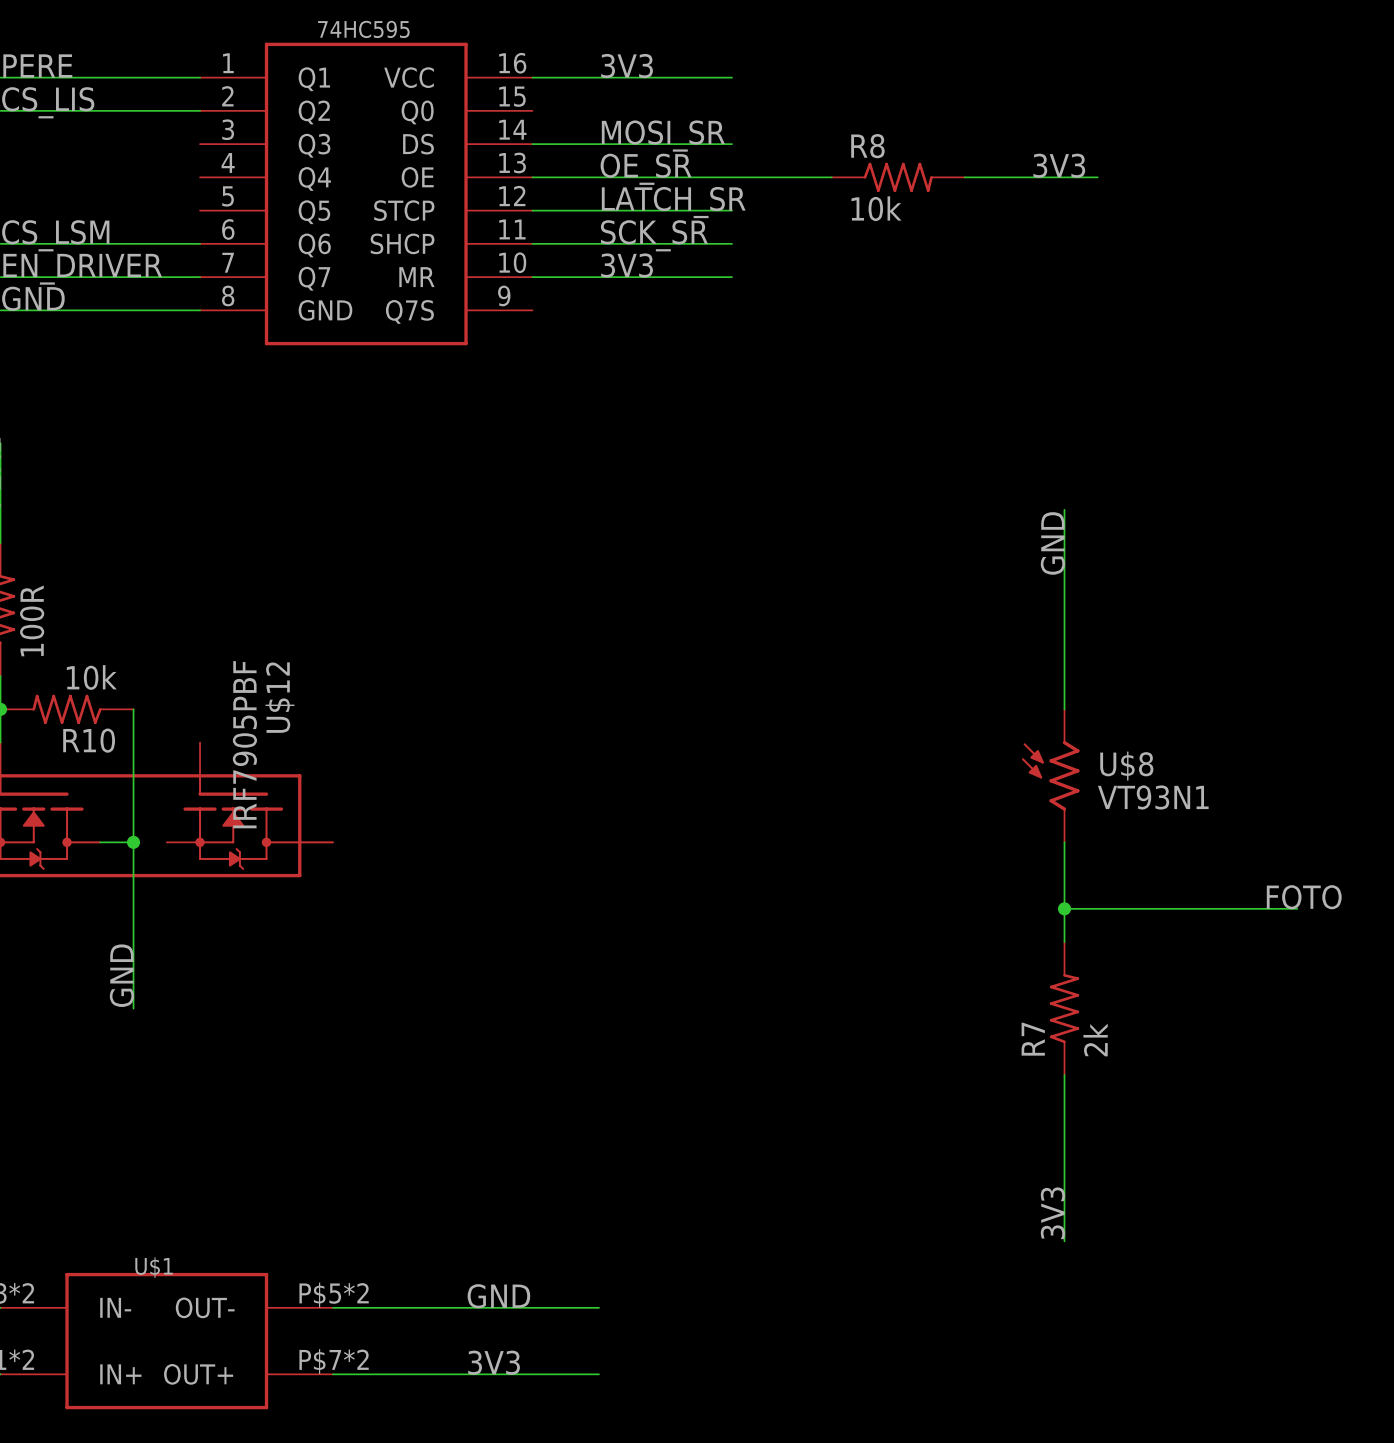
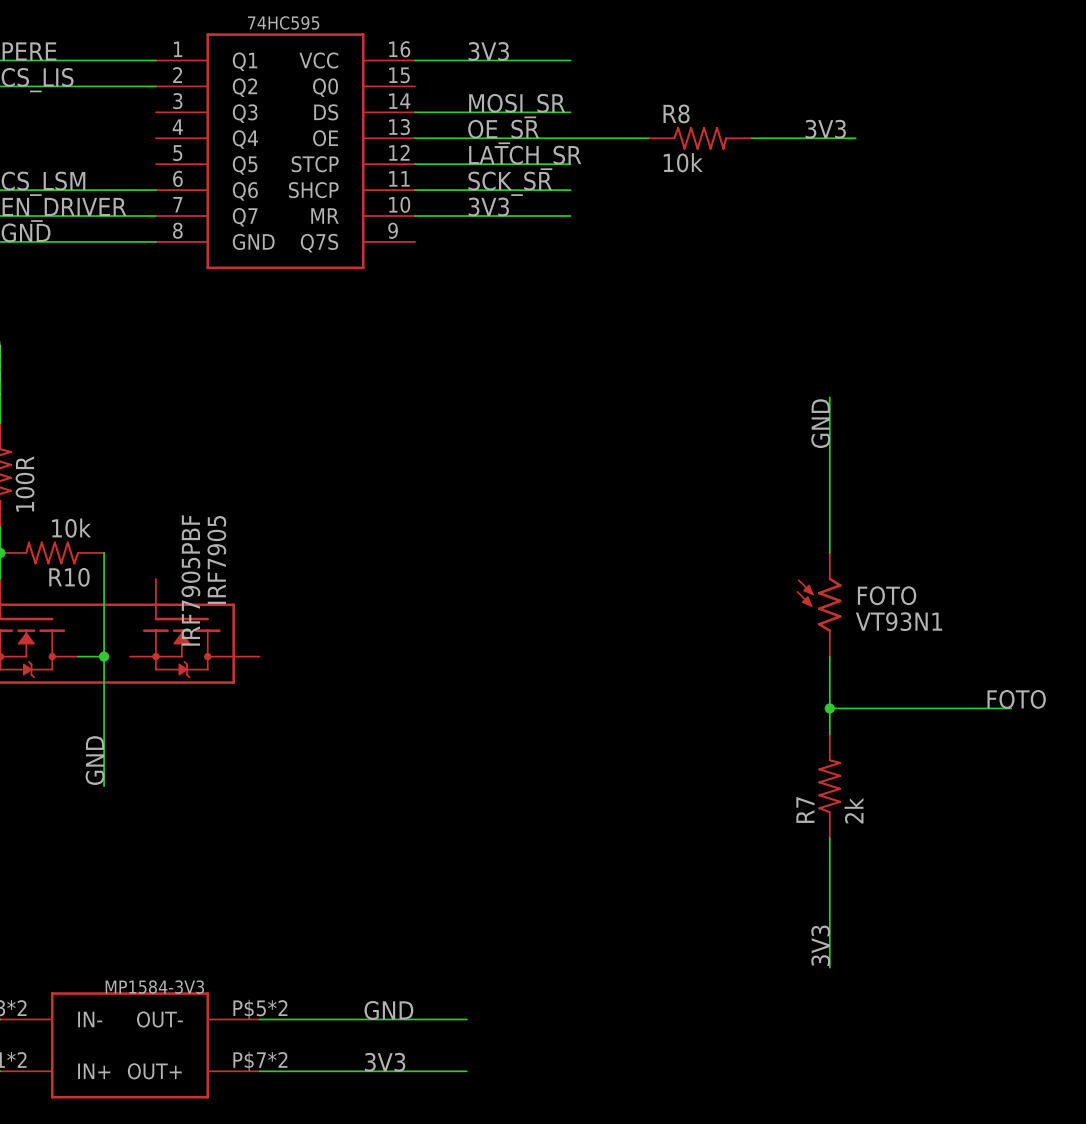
U$12 name: U$12 (280, 697) -> IRF7905 (216, 559)
U$8 name: U$8 (1126, 766) -> FOTO (887, 595)
U$1 name: U$1 (154, 1267) -> MP1584-3V3 (154, 987)

